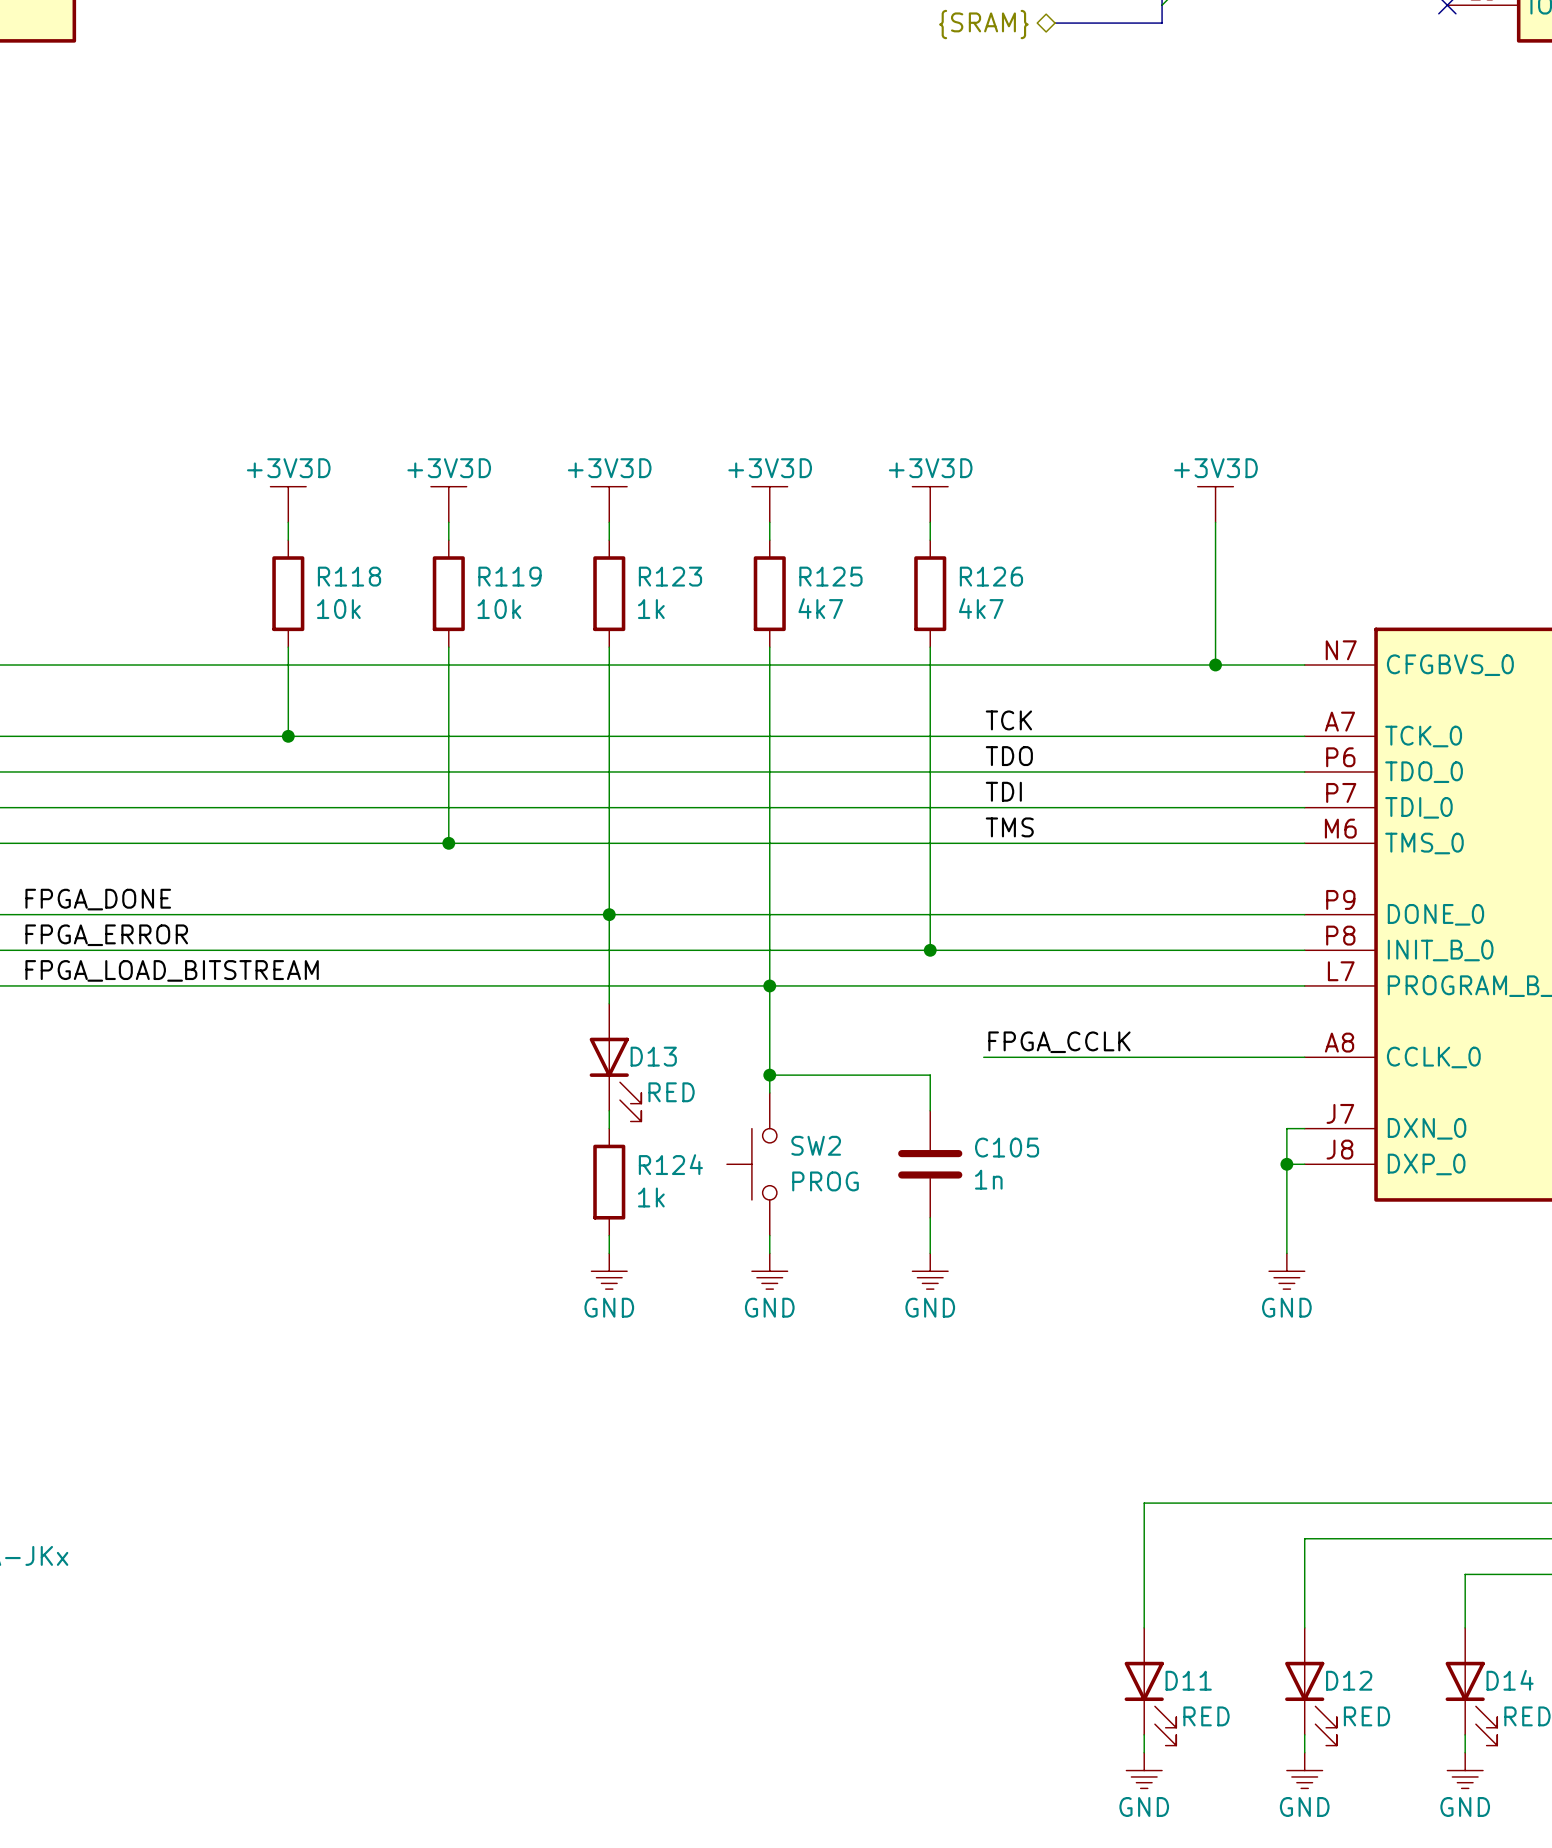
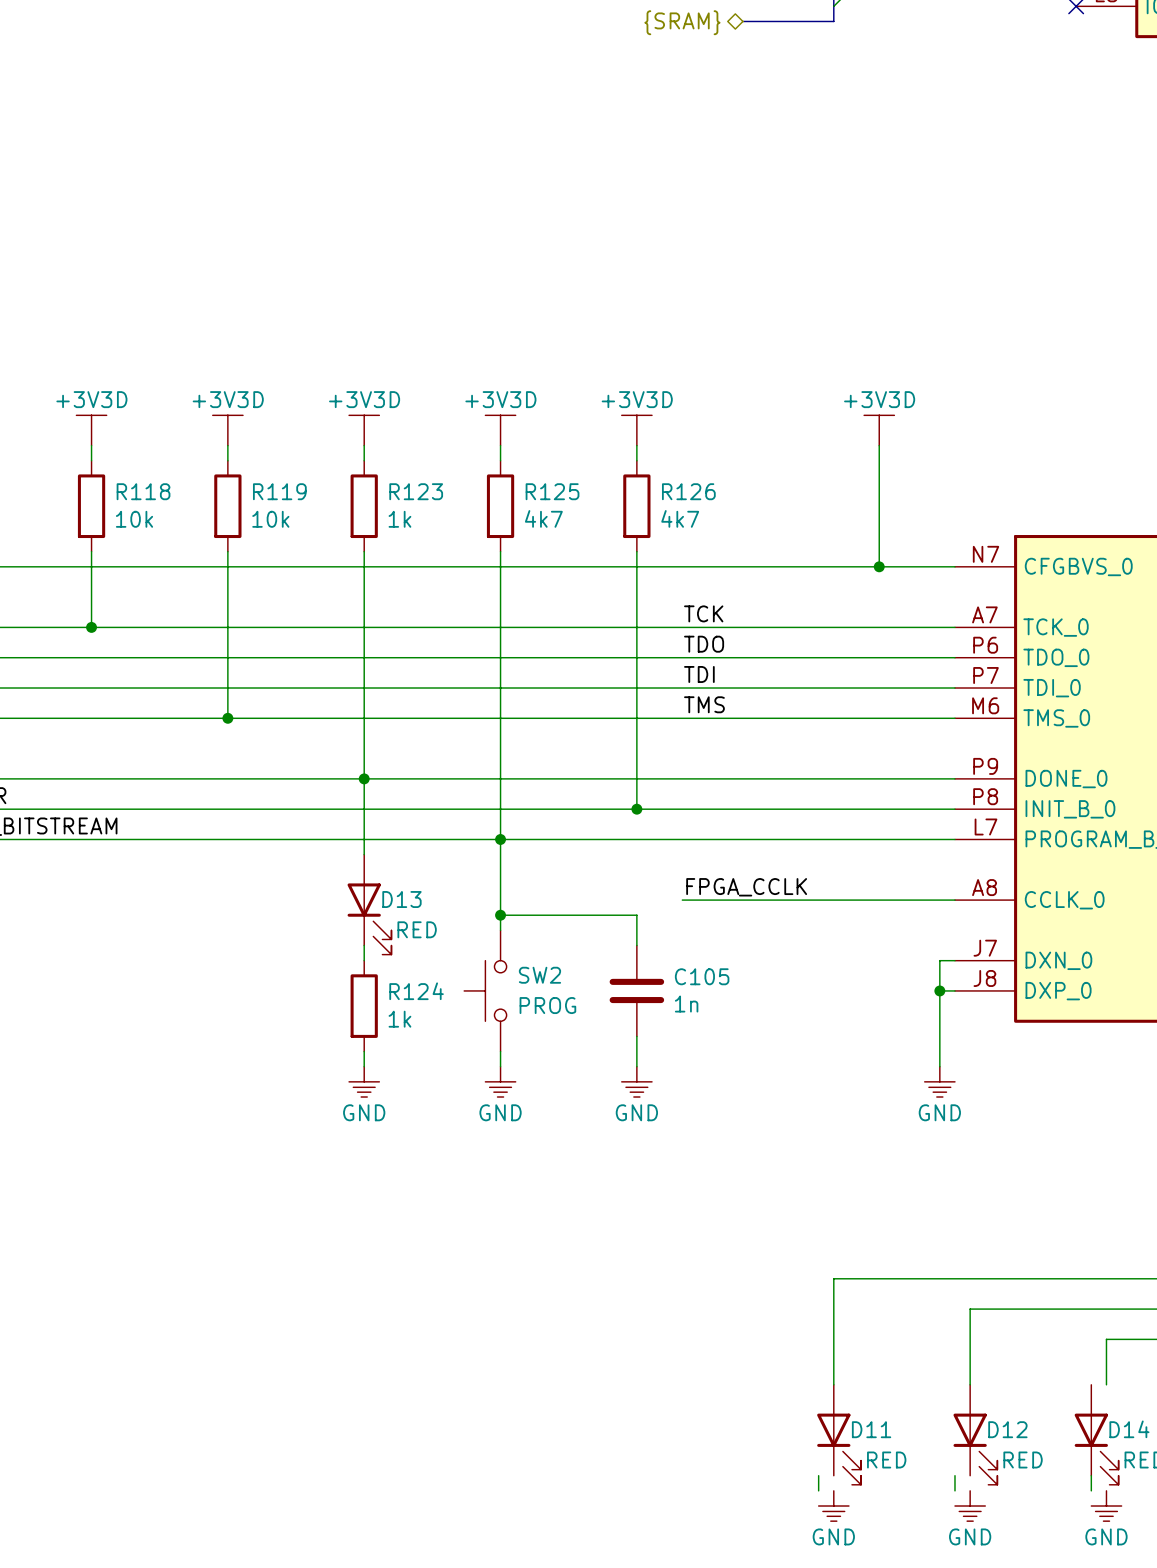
wire: (1162, 1503) (1144, 1503) (1144, 1627) -> (833, 1278) (833, 1384)
wire: (1322, 1538) (1304, 1538) (1304, 1627) -> (970, 1309) (970, 1384)
wire: (1483, 1574) (1465, 1574) (1465, 1627) -> (1106, 1339) (1106, 1384)
D11 position: (1150, 1686) -> (839, 1434)
D12 position: (1310, 1686) -> (975, 1434)
power symbol position: GND (1144, 1770) -> GND (833, 1506)
power symbol position: GND (1304, 1770) -> GND (970, 1506)
power symbol position: GND (1465, 1770) -> GND (1106, 1506)

